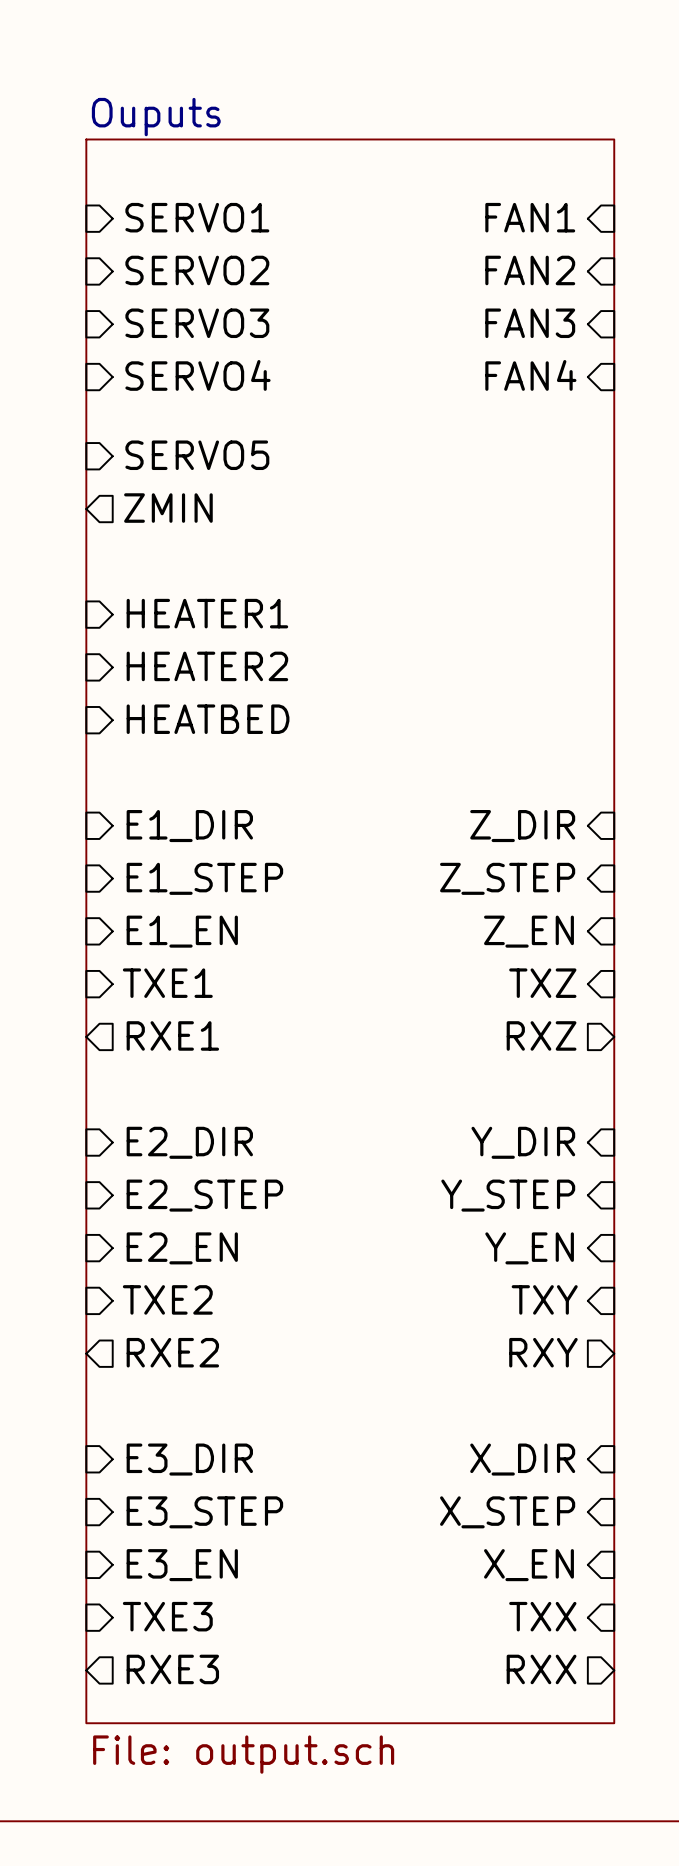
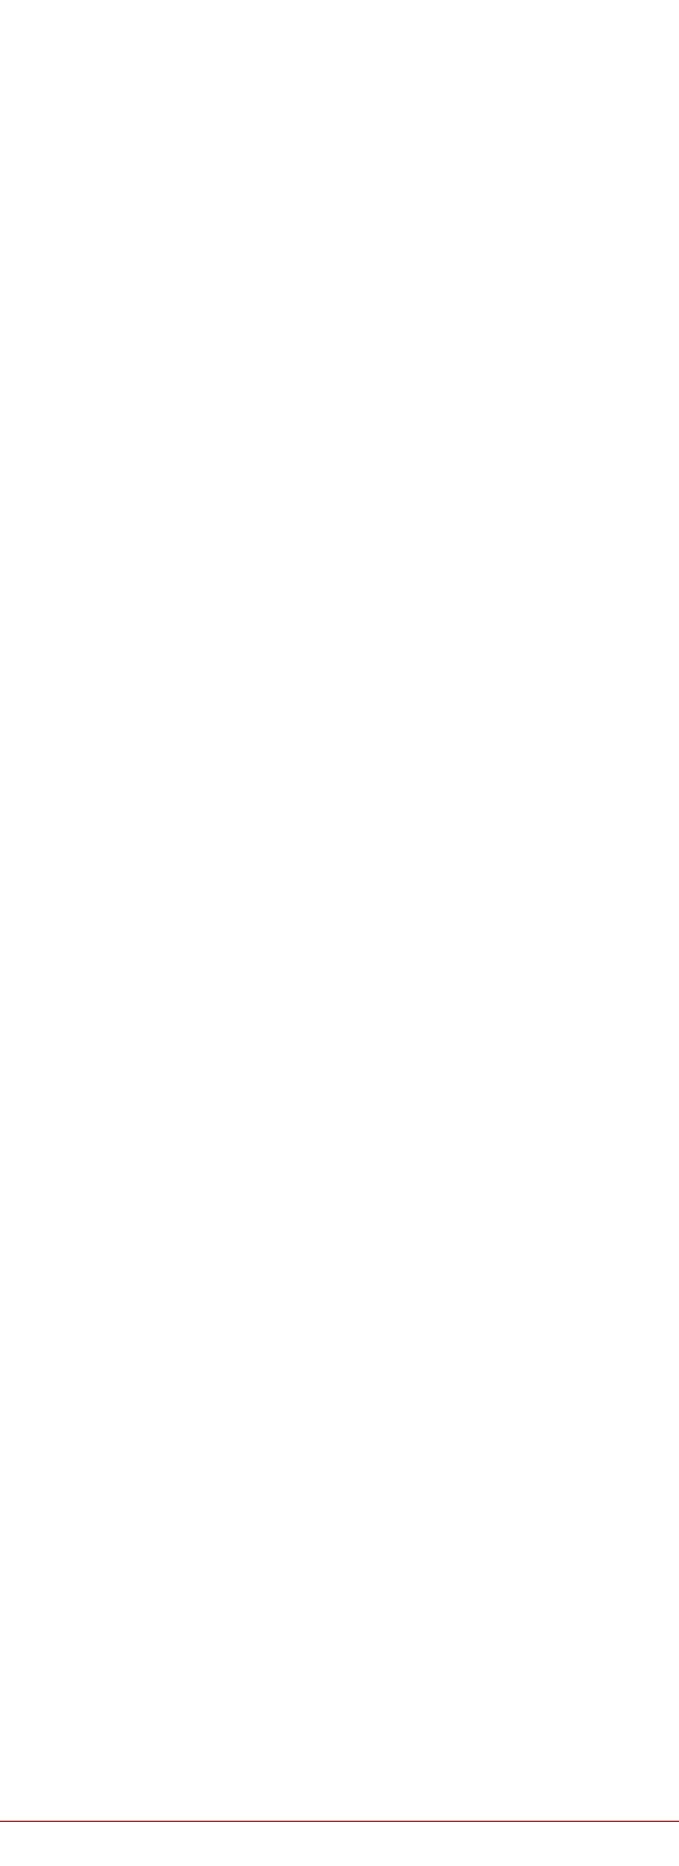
sheet pin: SERVO1 (197, 217) -> none
sheet pin: FAN1 (530, 217) -> none
sheet pin: SERVO2 (197, 270) -> none
sheet pin: FAN2 (530, 270) -> none
sheet pin: SERVO3 (197, 323) -> none
sheet pin: FAN3 (530, 323) -> none
sheet pin: SERVO4 (197, 375) -> none
sheet pin: FAN4 (530, 375) -> none
sheet pin: SERVO5 (197, 455) -> none
sheet pin: ZMIN (168, 508) -> none
sheet pin: HEATER1 (207, 613) -> none
sheet pin: HEATER2 (207, 666) -> none
sheet pin: HEATBED (208, 719) -> none
sheet pin: E1_DIR (189, 826) -> none
sheet pin: Z_DIR (522, 826) -> none
sheet pin: E1_STEP (204, 878) -> none
sheet pin: Z_STEP (507, 878) -> none
sheet pin: E1_EN (182, 931) -> none
sheet Ouputs: File: output.sch (350, 931) -> none
sheet pin: Z_EN (528, 931) -> none
sheet pin: TXE1 (167, 983) -> none
sheet pin: TXZ (542, 983) -> none
sheet pin: RXE1 (172, 1035) -> none
sheet pin: RXZ (541, 1035) -> none
sheet pin: E2_DIR (189, 1142) -> none
sheet pin: Y_DIR (523, 1142) -> none
sheet pin: E2_STEP (204, 1195) -> none
sheet pin: Y_STEP (508, 1195) -> none
sheet pin: E2_EN (182, 1248) -> none
sheet pin: Y_EN (529, 1248) -> none
sheet pin: TXE2 (167, 1299) -> none
sheet pin: TXY (544, 1299) -> none
sheet pin: RXE2 (172, 1352) -> none
sheet pin: RXY (543, 1352) -> none
sheet pin: E3_DIR (189, 1459) -> none
sheet pin: X_DIR (522, 1459) -> none
sheet pin: E3_STEP (204, 1512) -> none
sheet pin: X_STEP (507, 1512) -> none
sheet pin: E3_EN (182, 1565) -> none
sheet pin: X_EN (528, 1565) -> none
sheet pin: TXE3 (167, 1616) -> none
sheet pin: TXX (542, 1616) -> none
sheet pin: RXE3 (172, 1669) -> none
sheet pin: RXX (541, 1669) -> none

